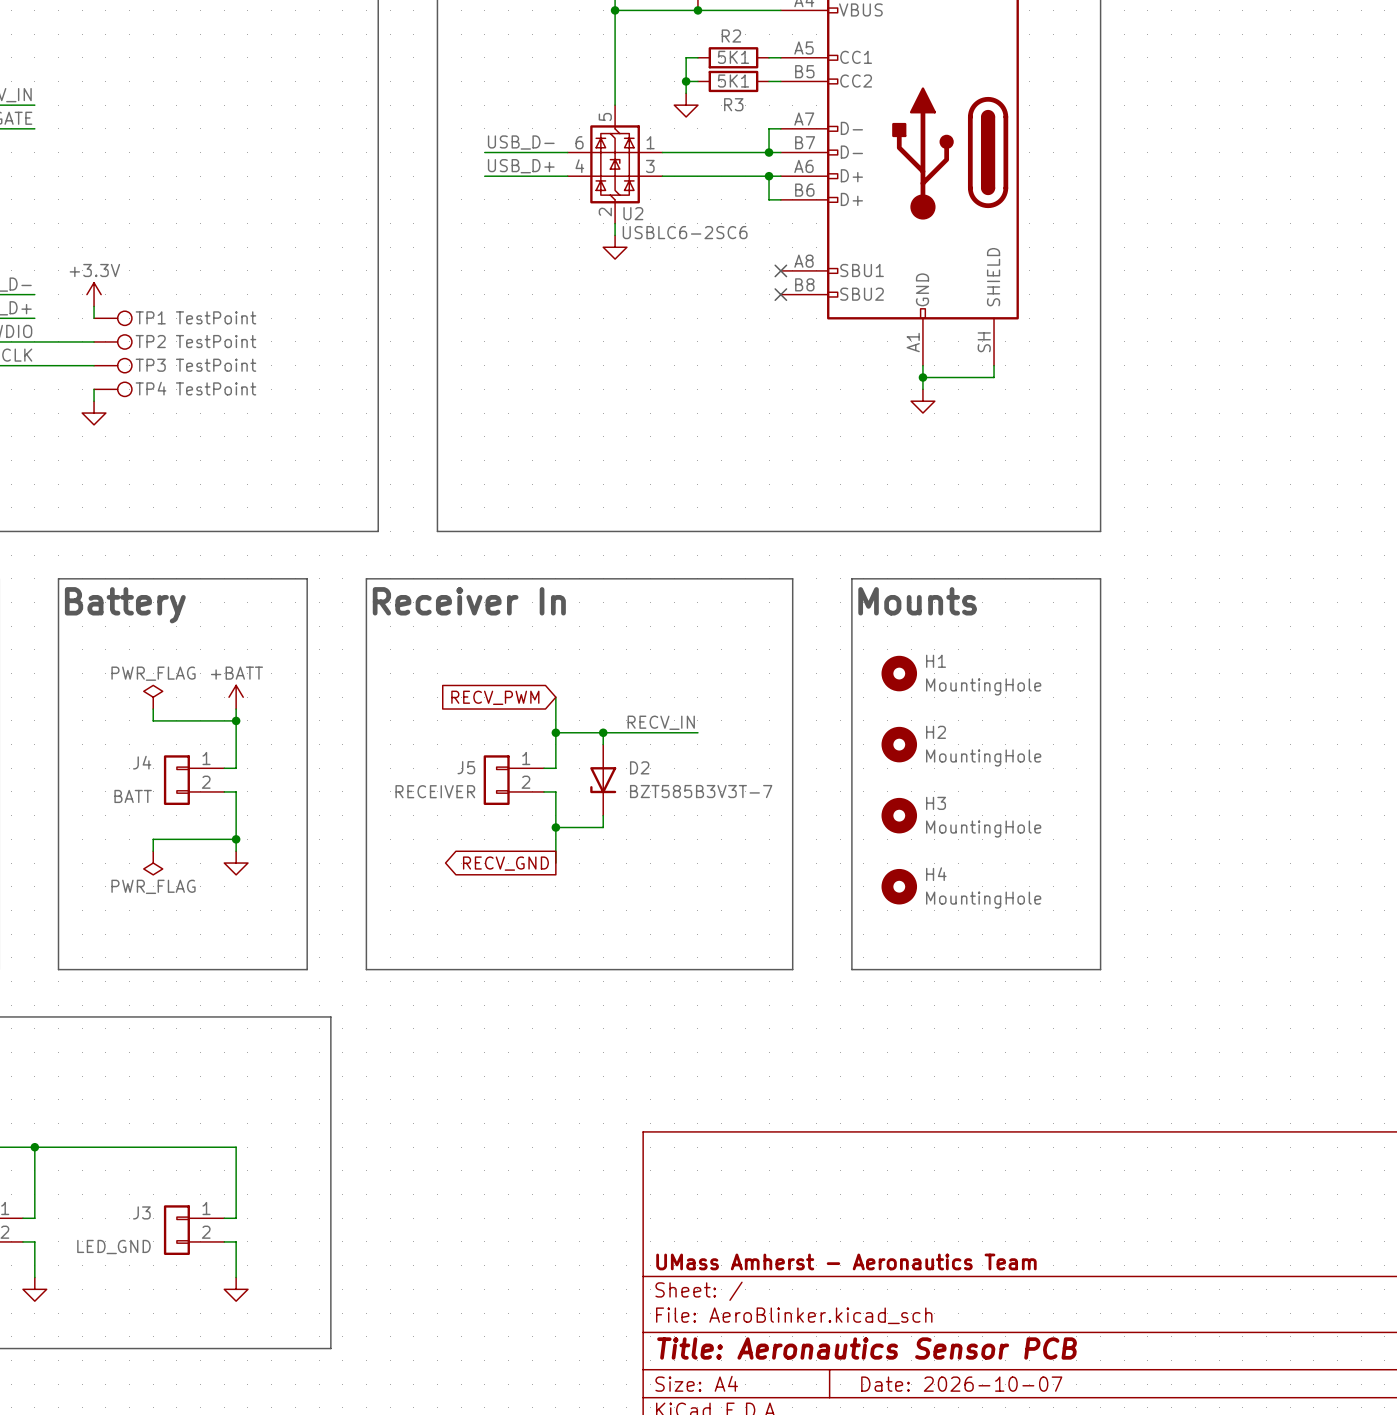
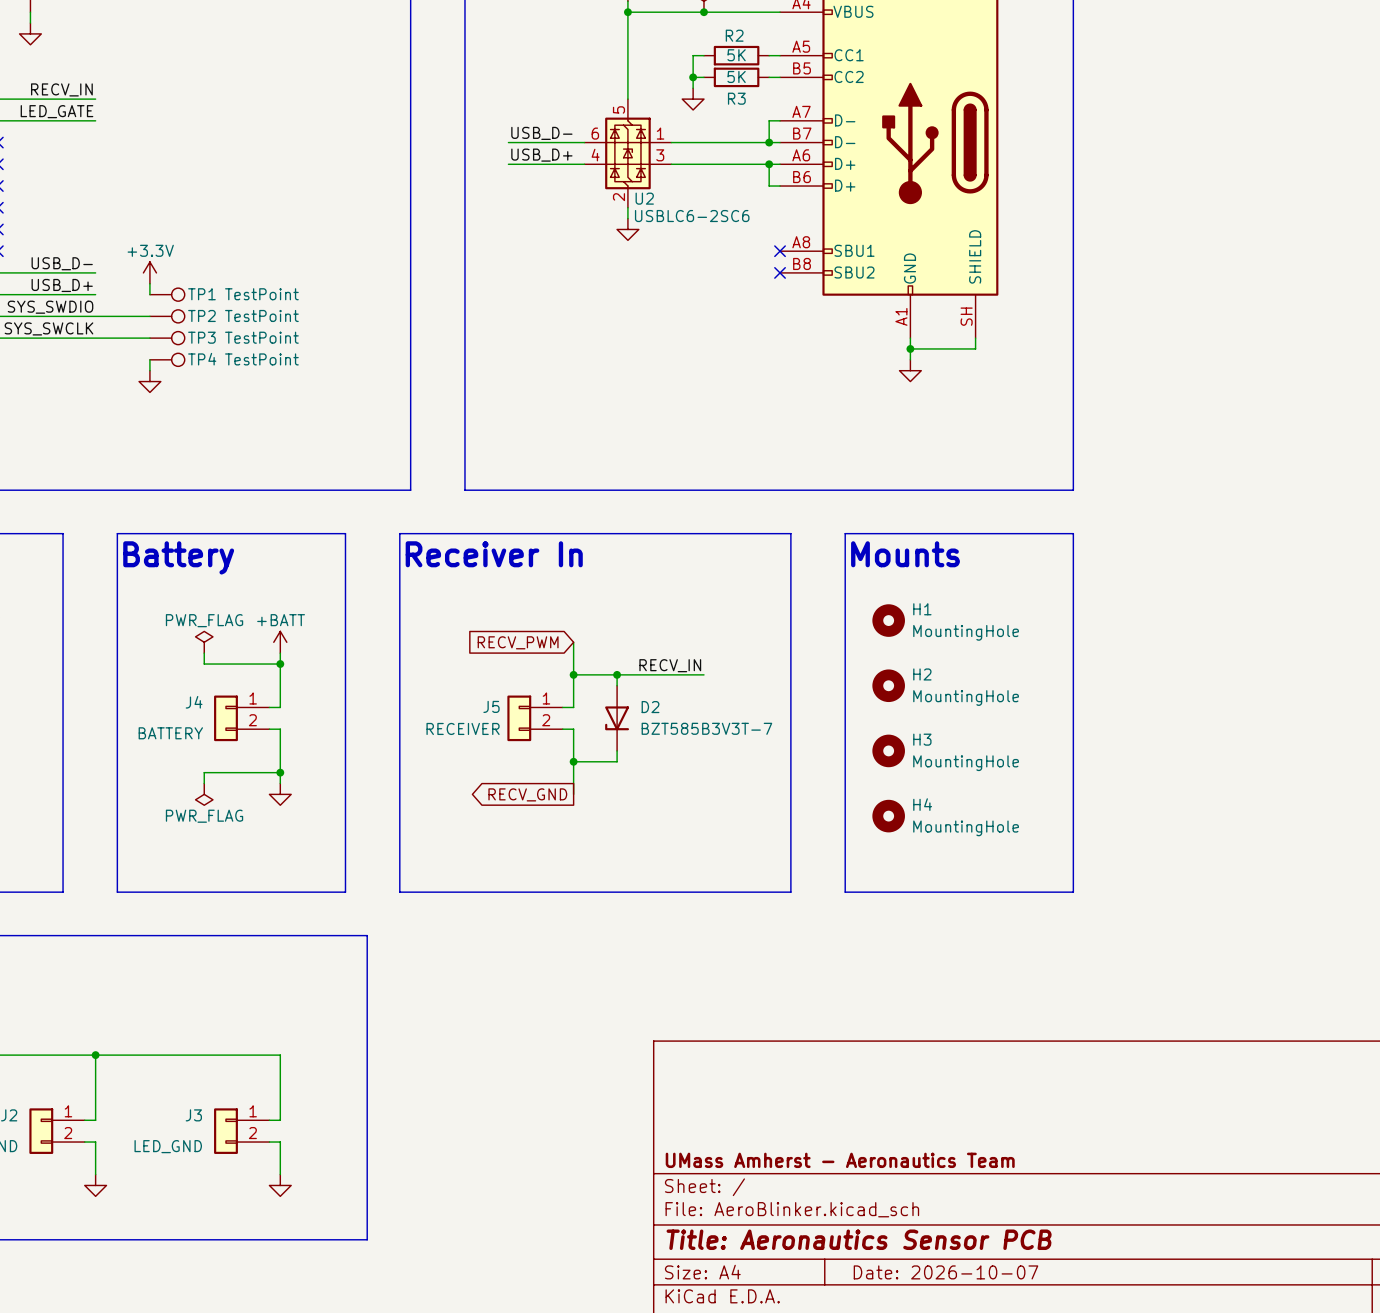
R2 value: 5K1 (733, 57) -> 5K (736, 55)
R3 value: 5K1 (733, 81) -> 5K (736, 76)
J4 value: BATT (133, 796) -> BATTERY (170, 733)

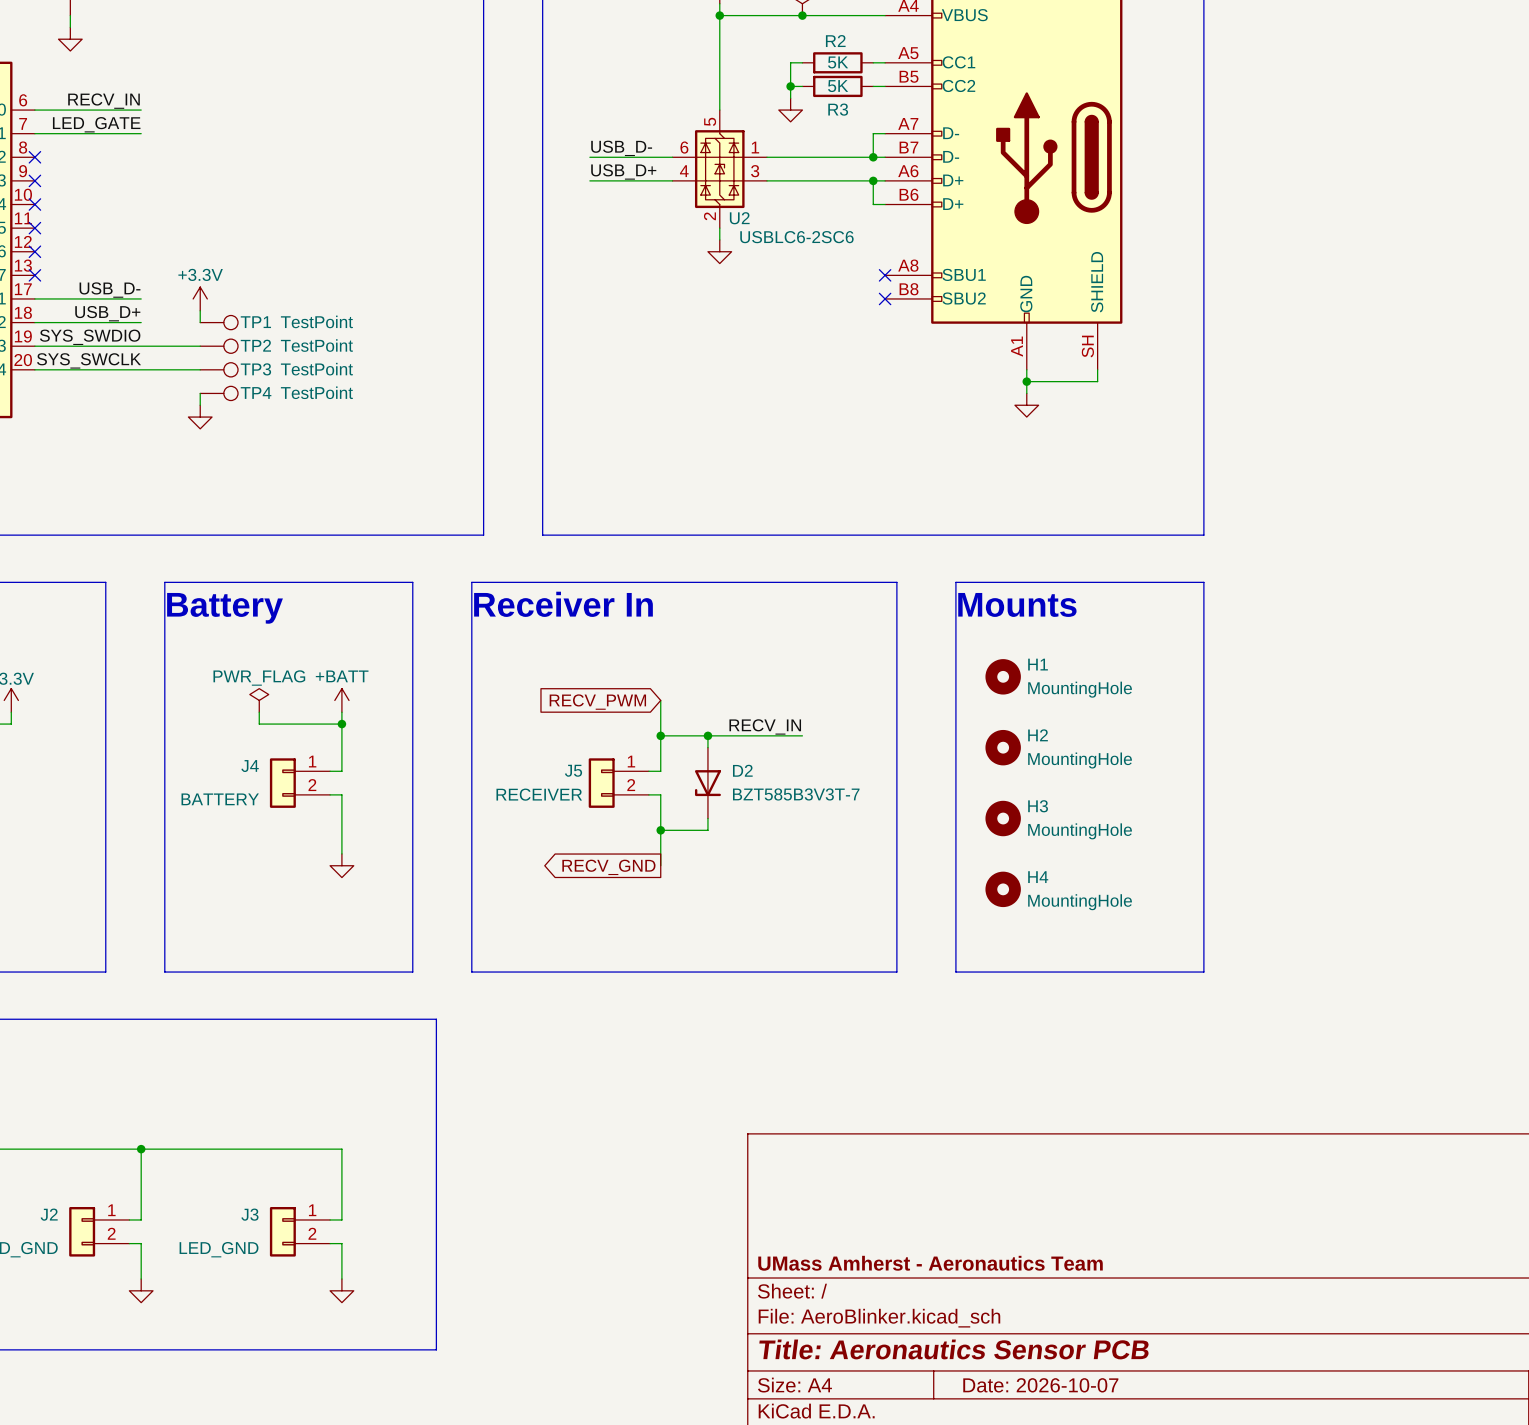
wire: (280, 772) (204, 772) (204, 783) -> none
junction: (280, 772) -> none
power symbol: PWR_FLAG (204, 794) -> none

